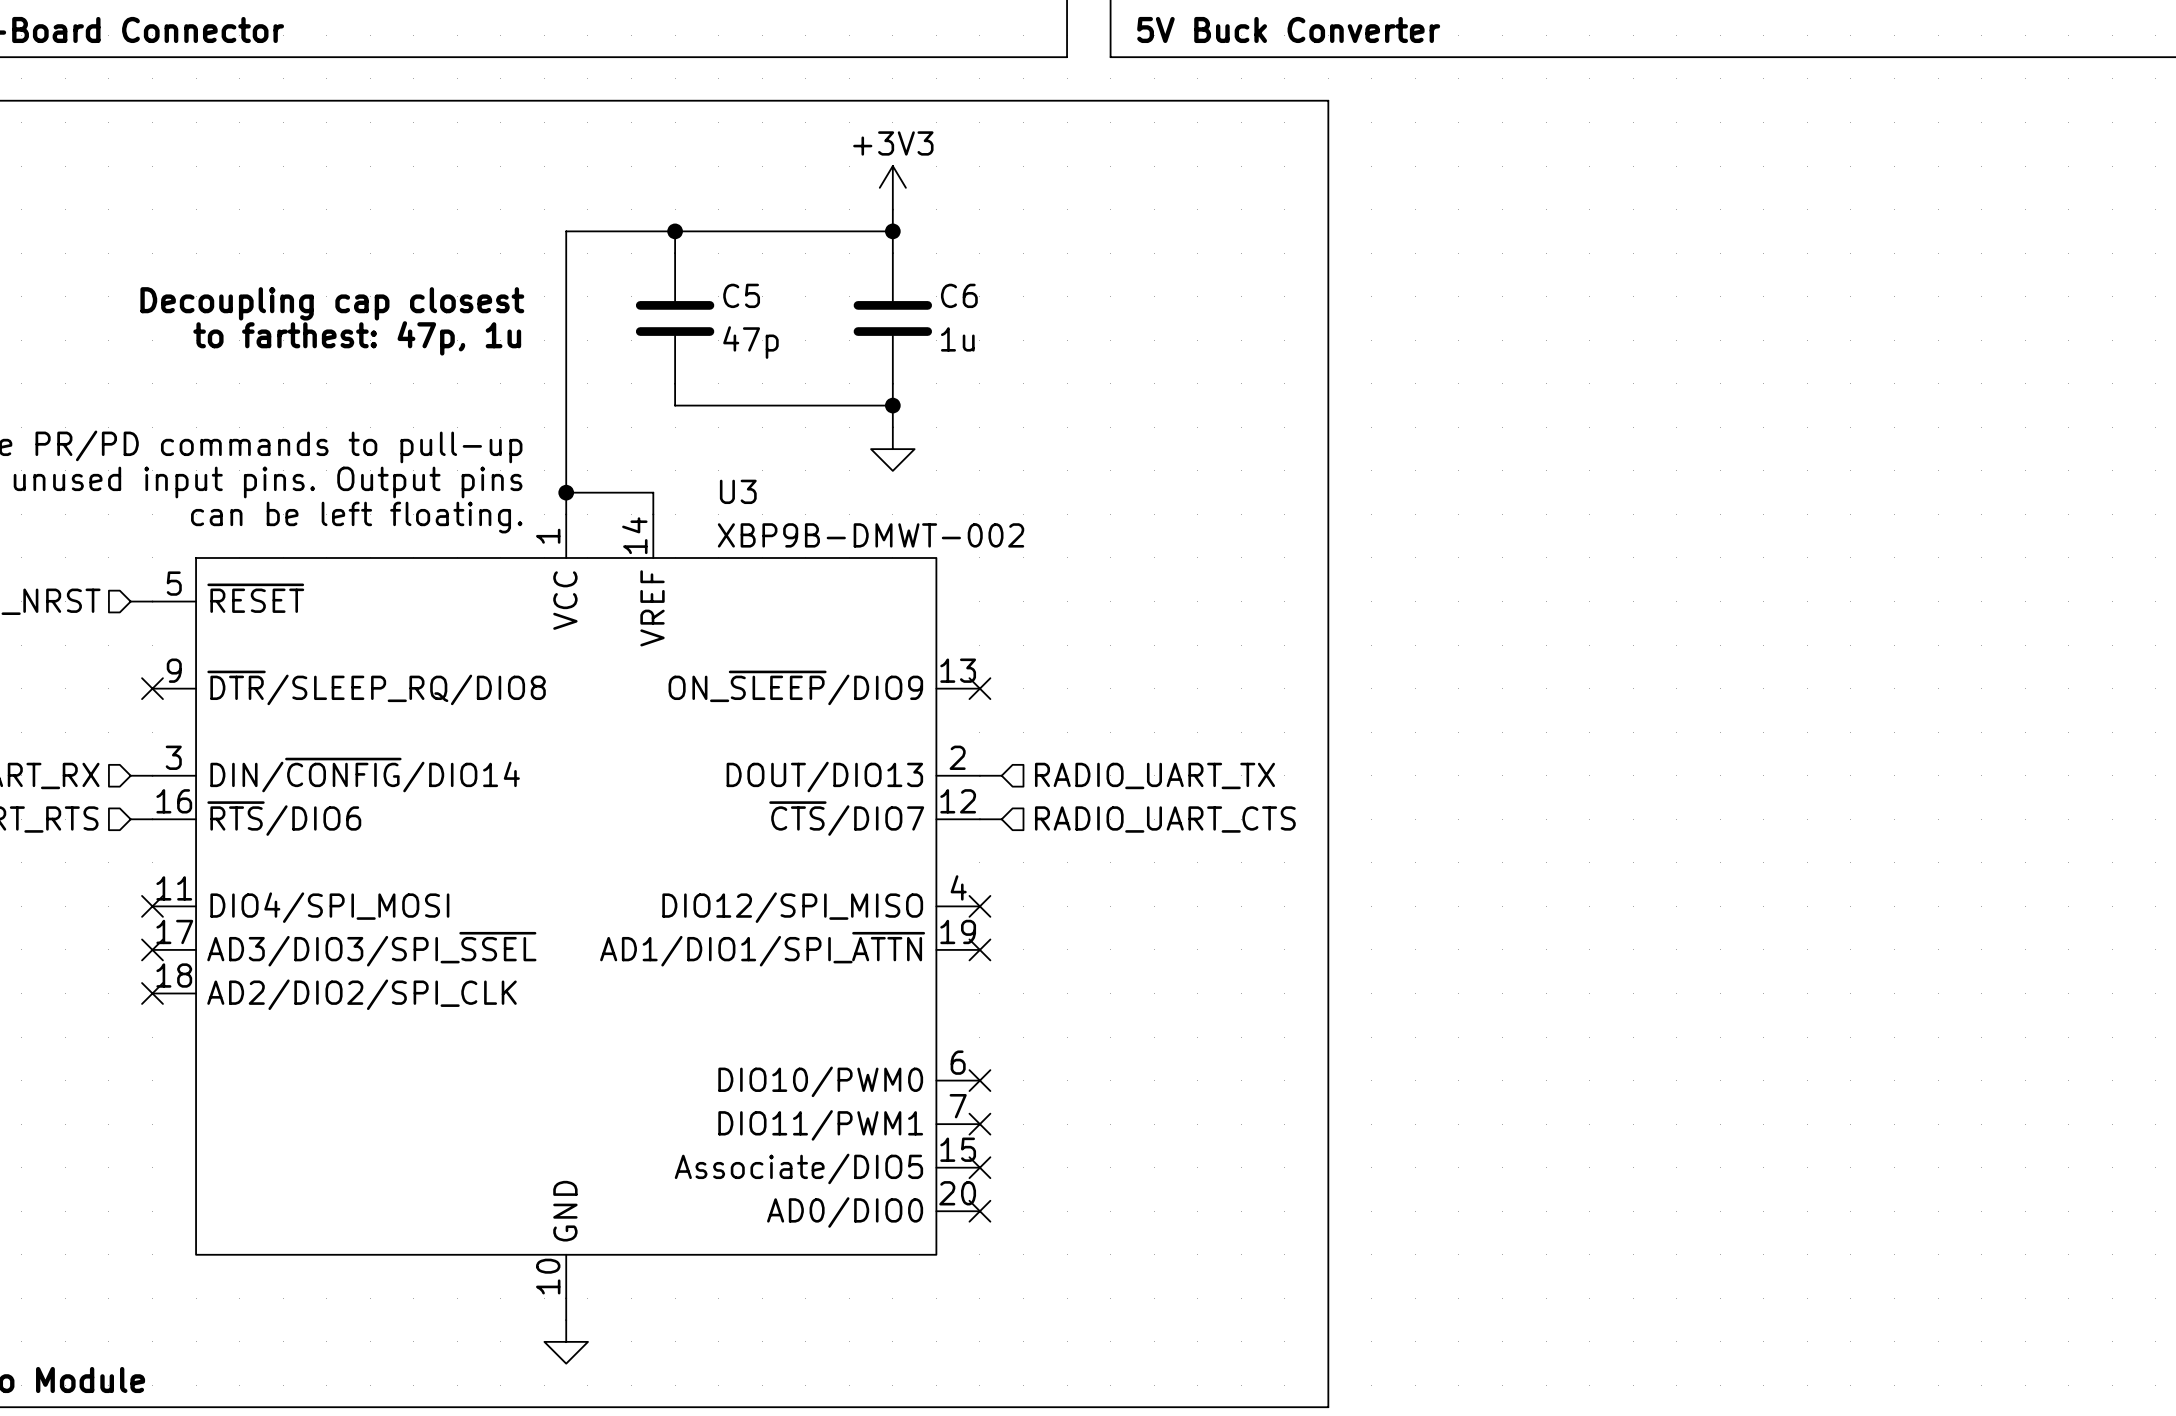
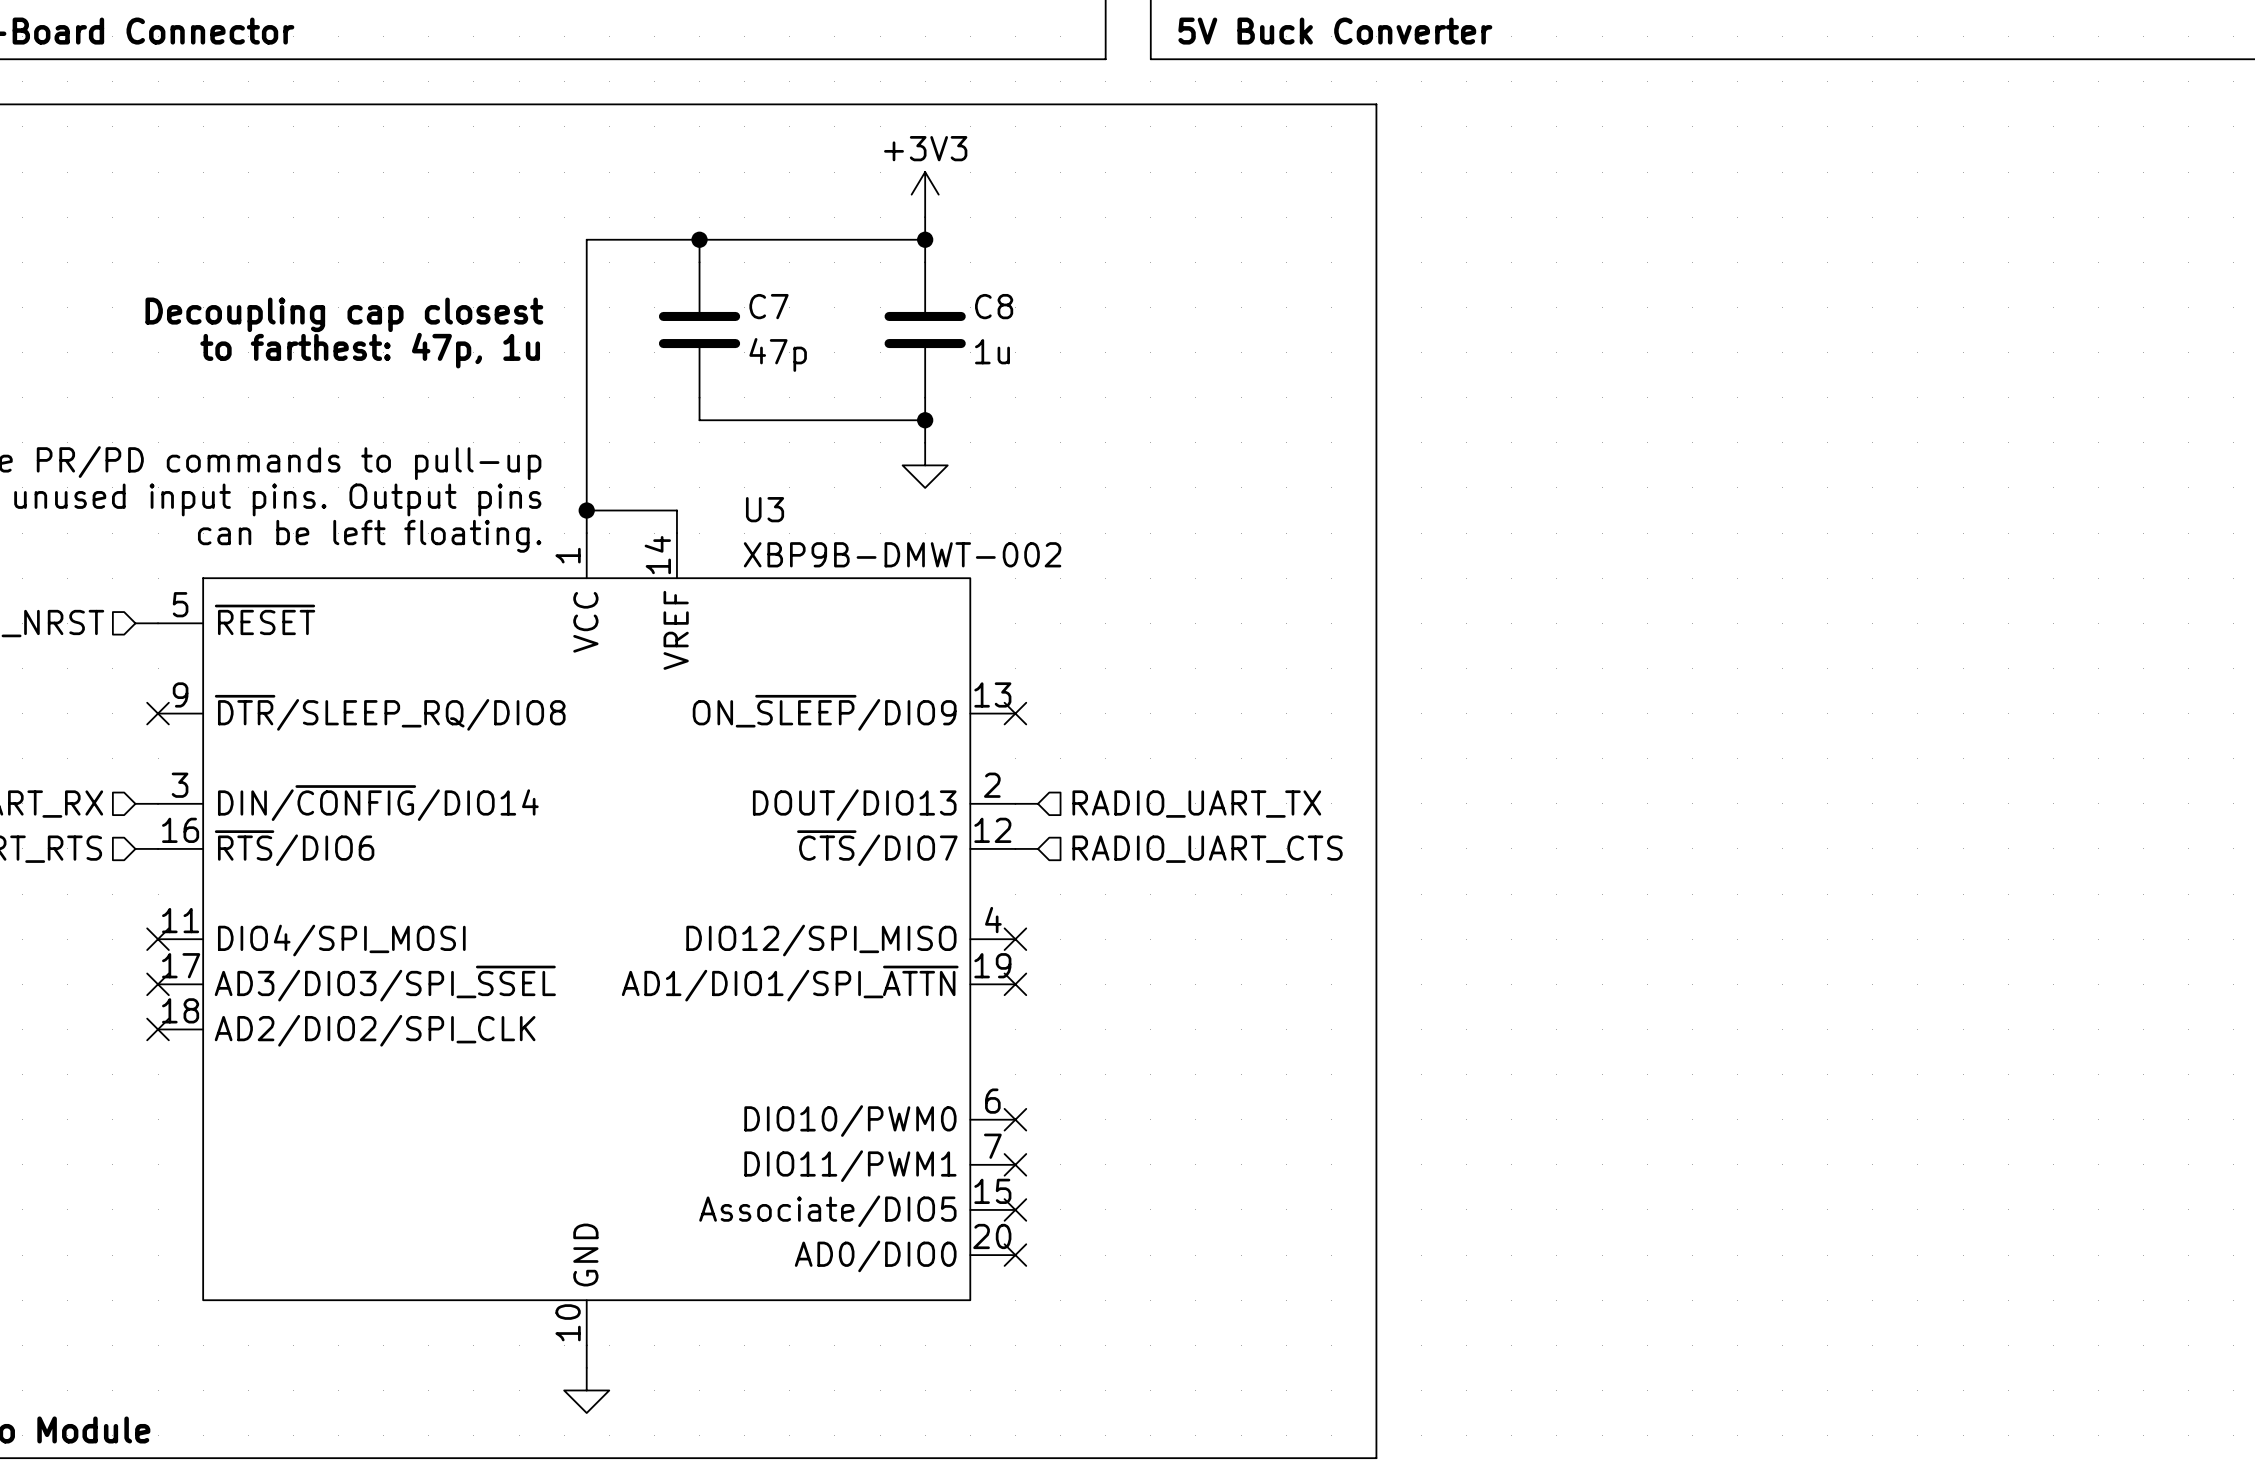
C5 name: C5 (741, 295) -> C7 (769, 306)
C6 name: C6 (959, 295) -> C8 (994, 306)

